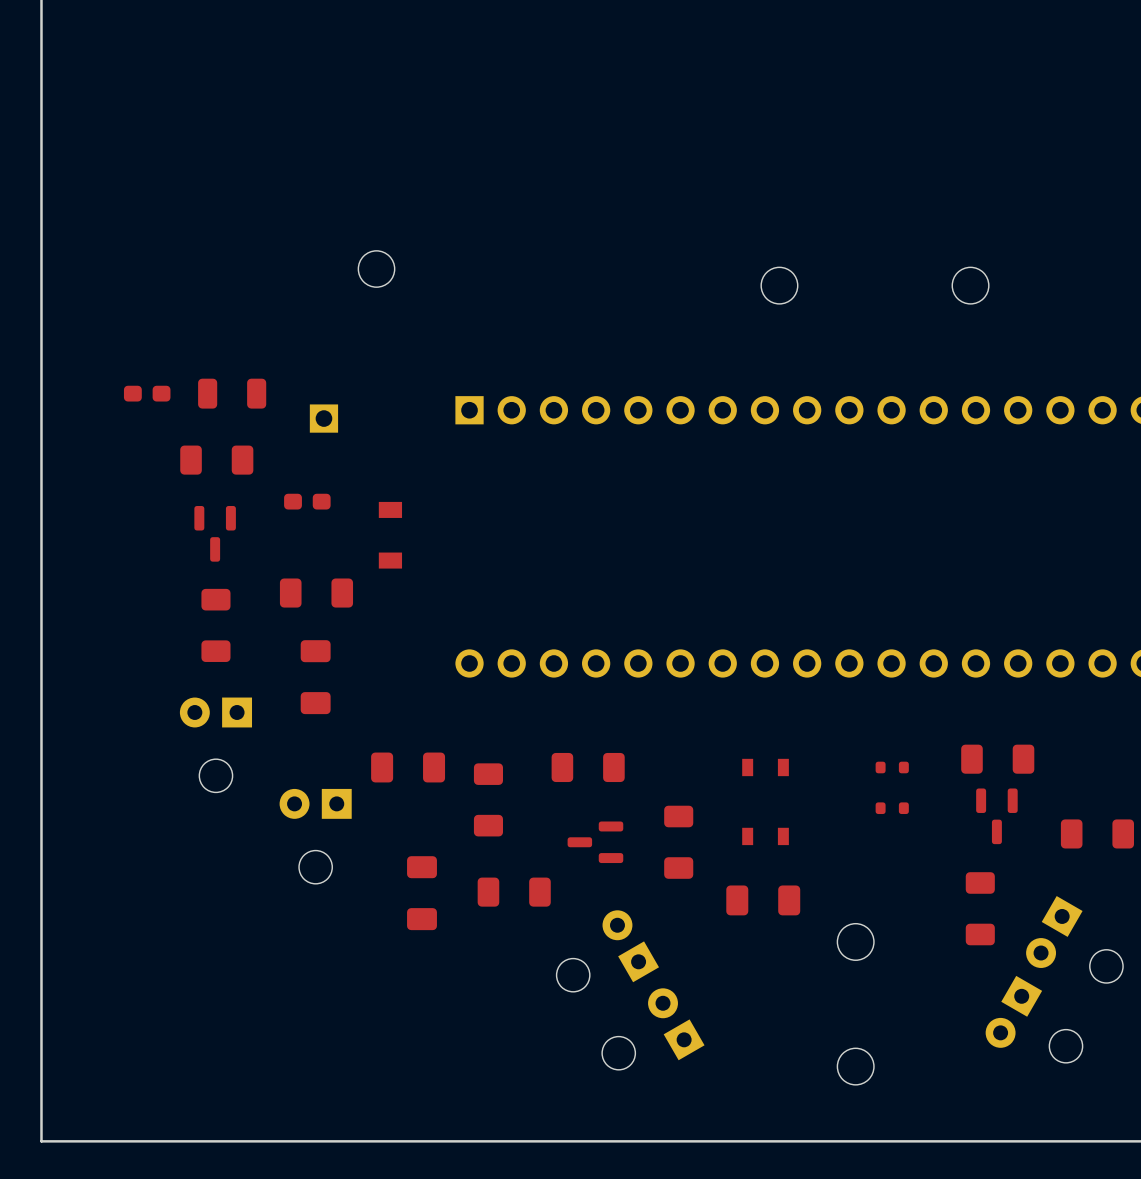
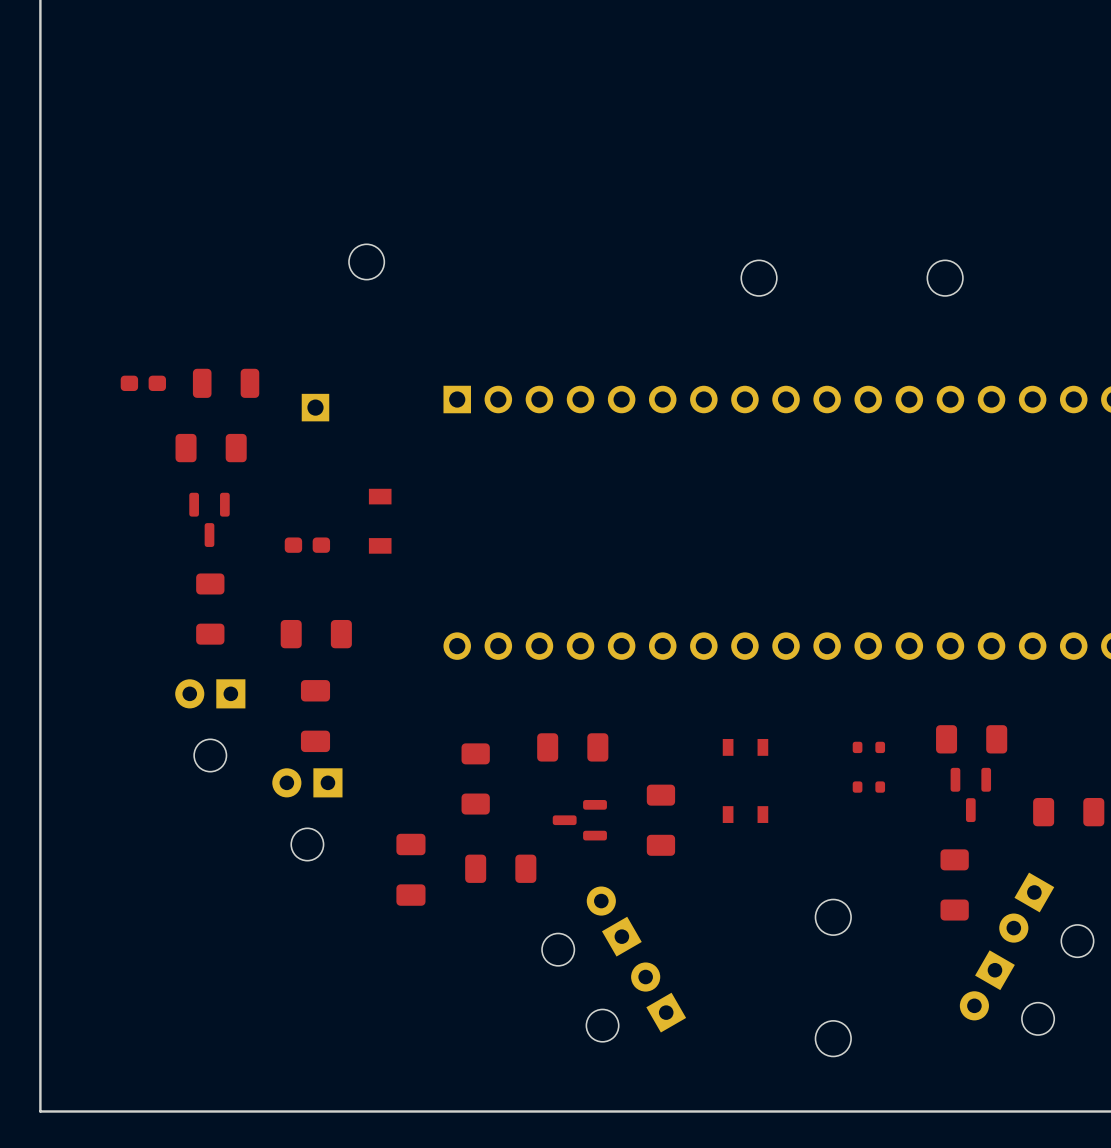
part position: (307, 501) -> (307, 545)
part position: (316, 593) -> (316, 634)
part: (315, 677) -> none
part: none -> (315, 716)
part: (408, 767) -> none
part: (763, 900) -> none

